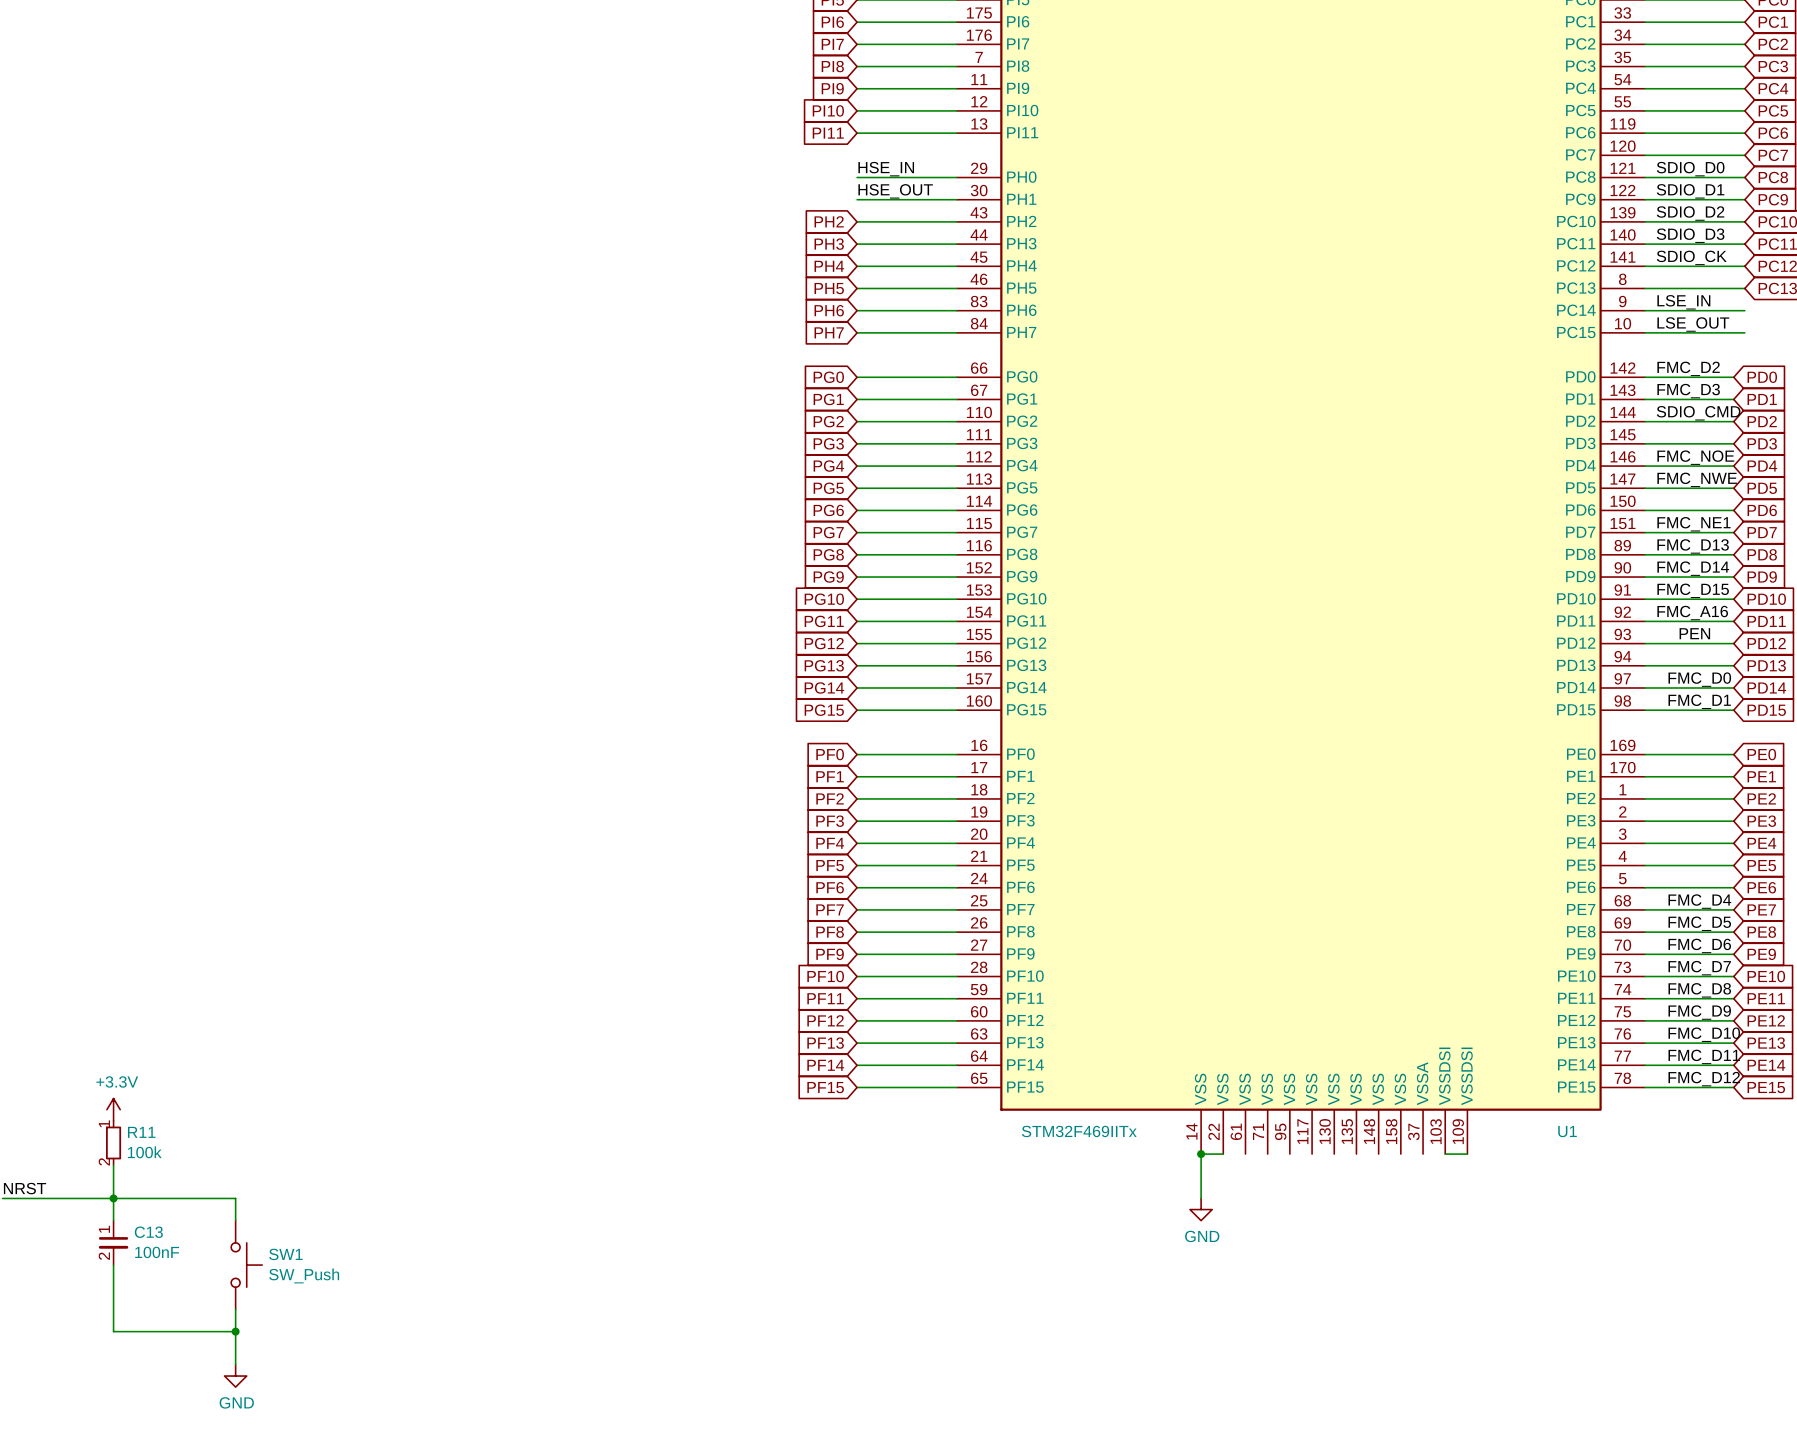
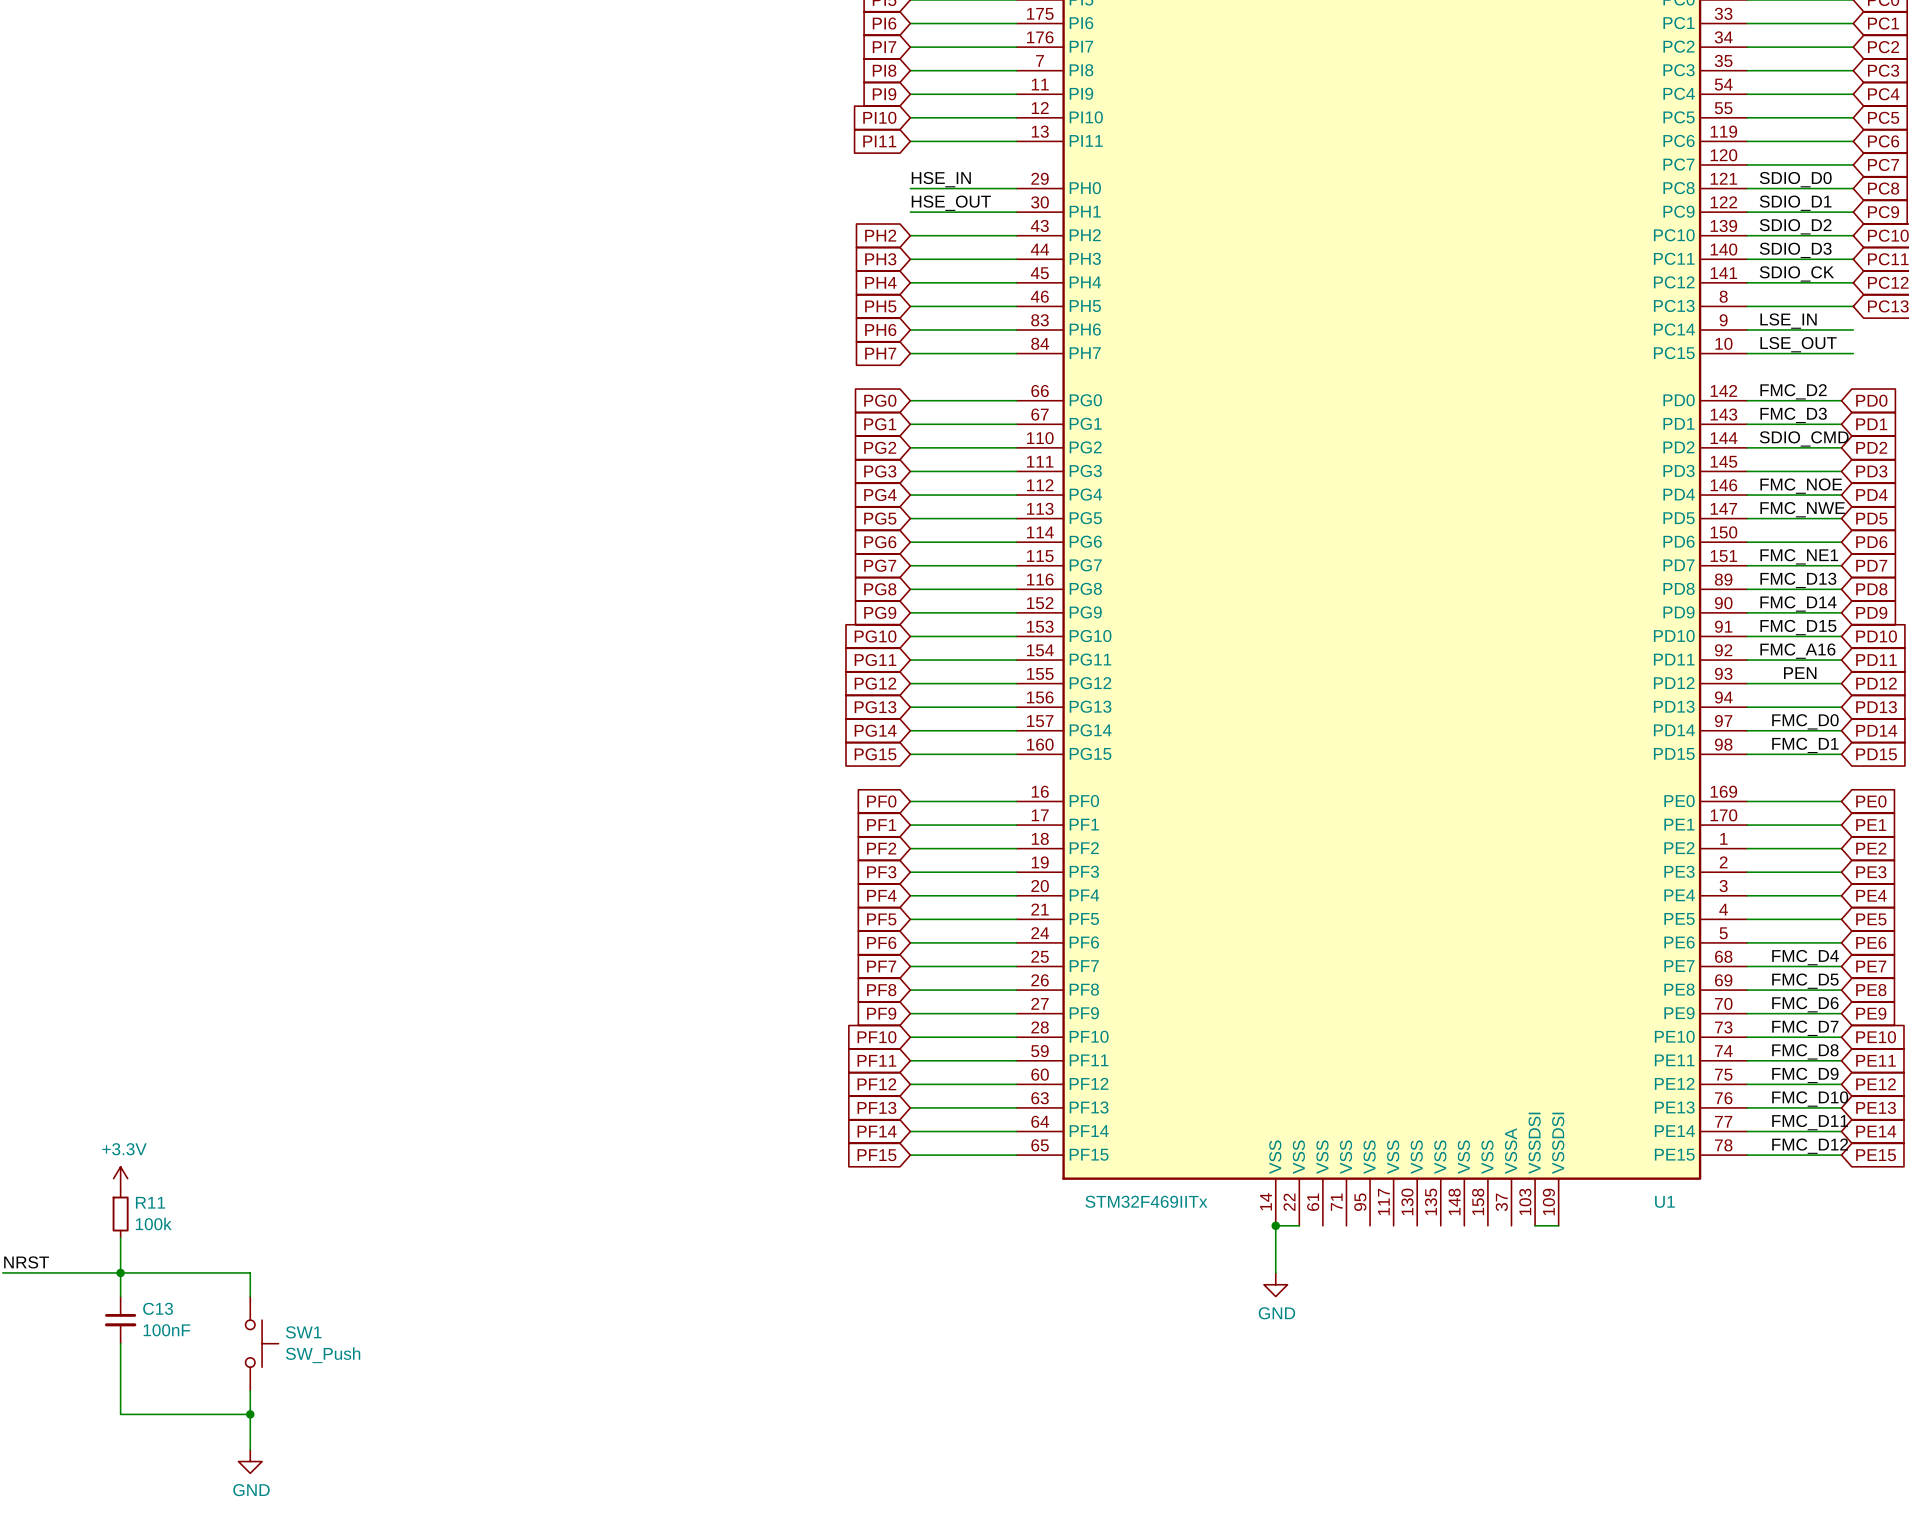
R11 pin number: 1 (104, 1123) -> none
R11 pin number: 2 (104, 1161) -> none
C13 pin number: 1 (104, 1229) -> none
C13 pin number: 2 (104, 1256) -> none

